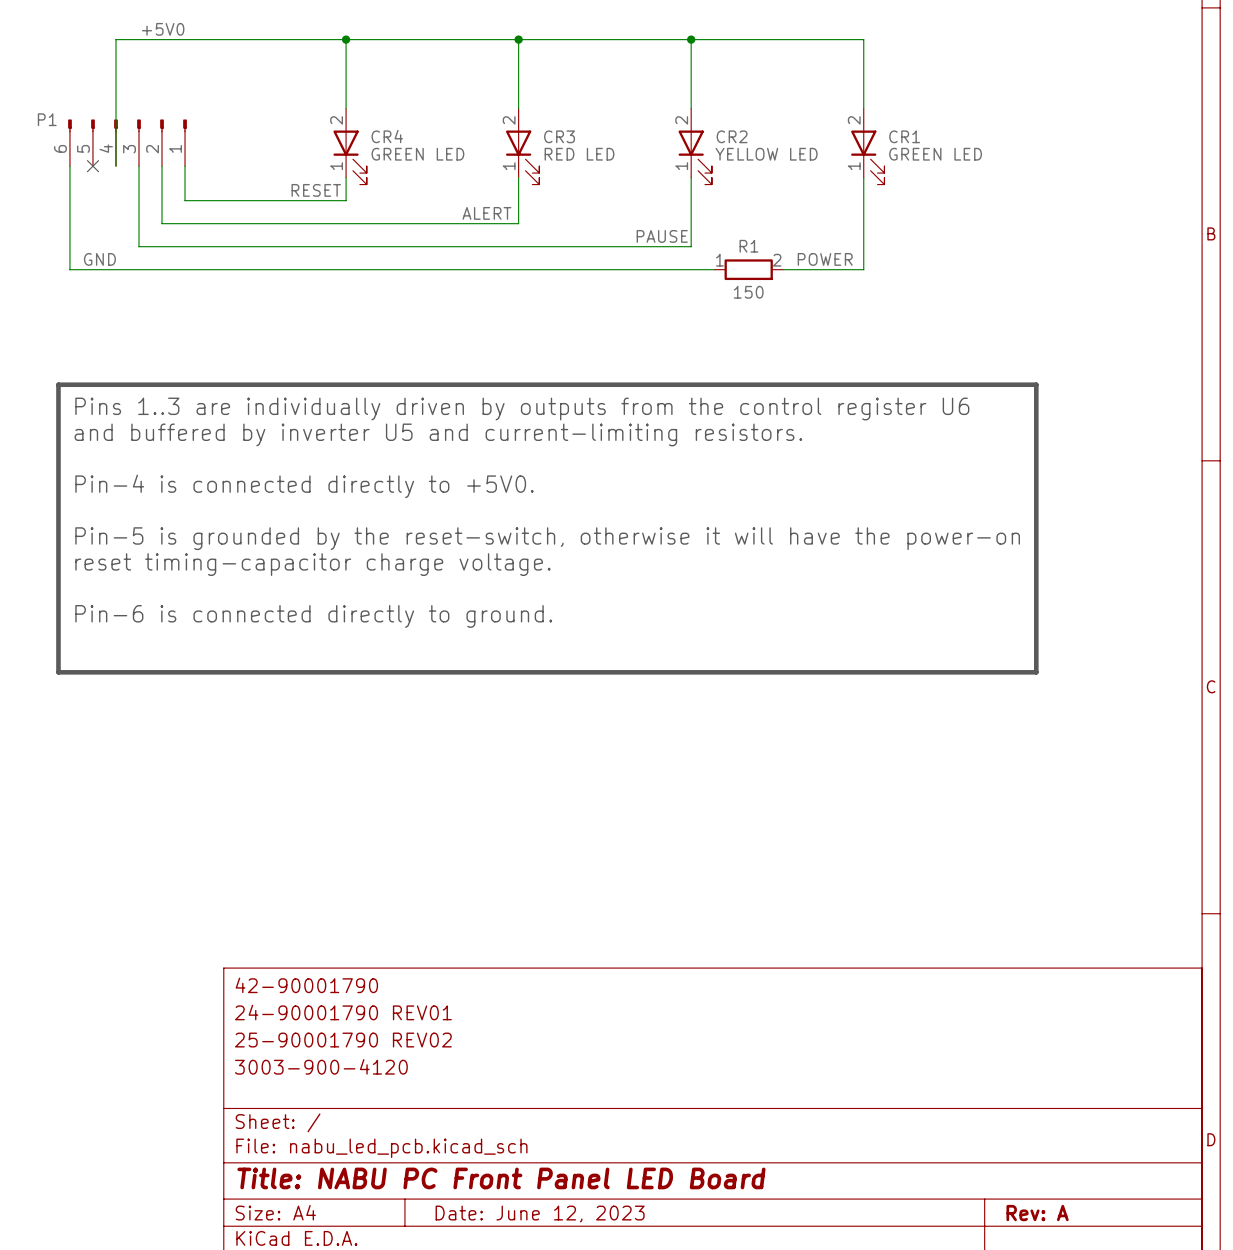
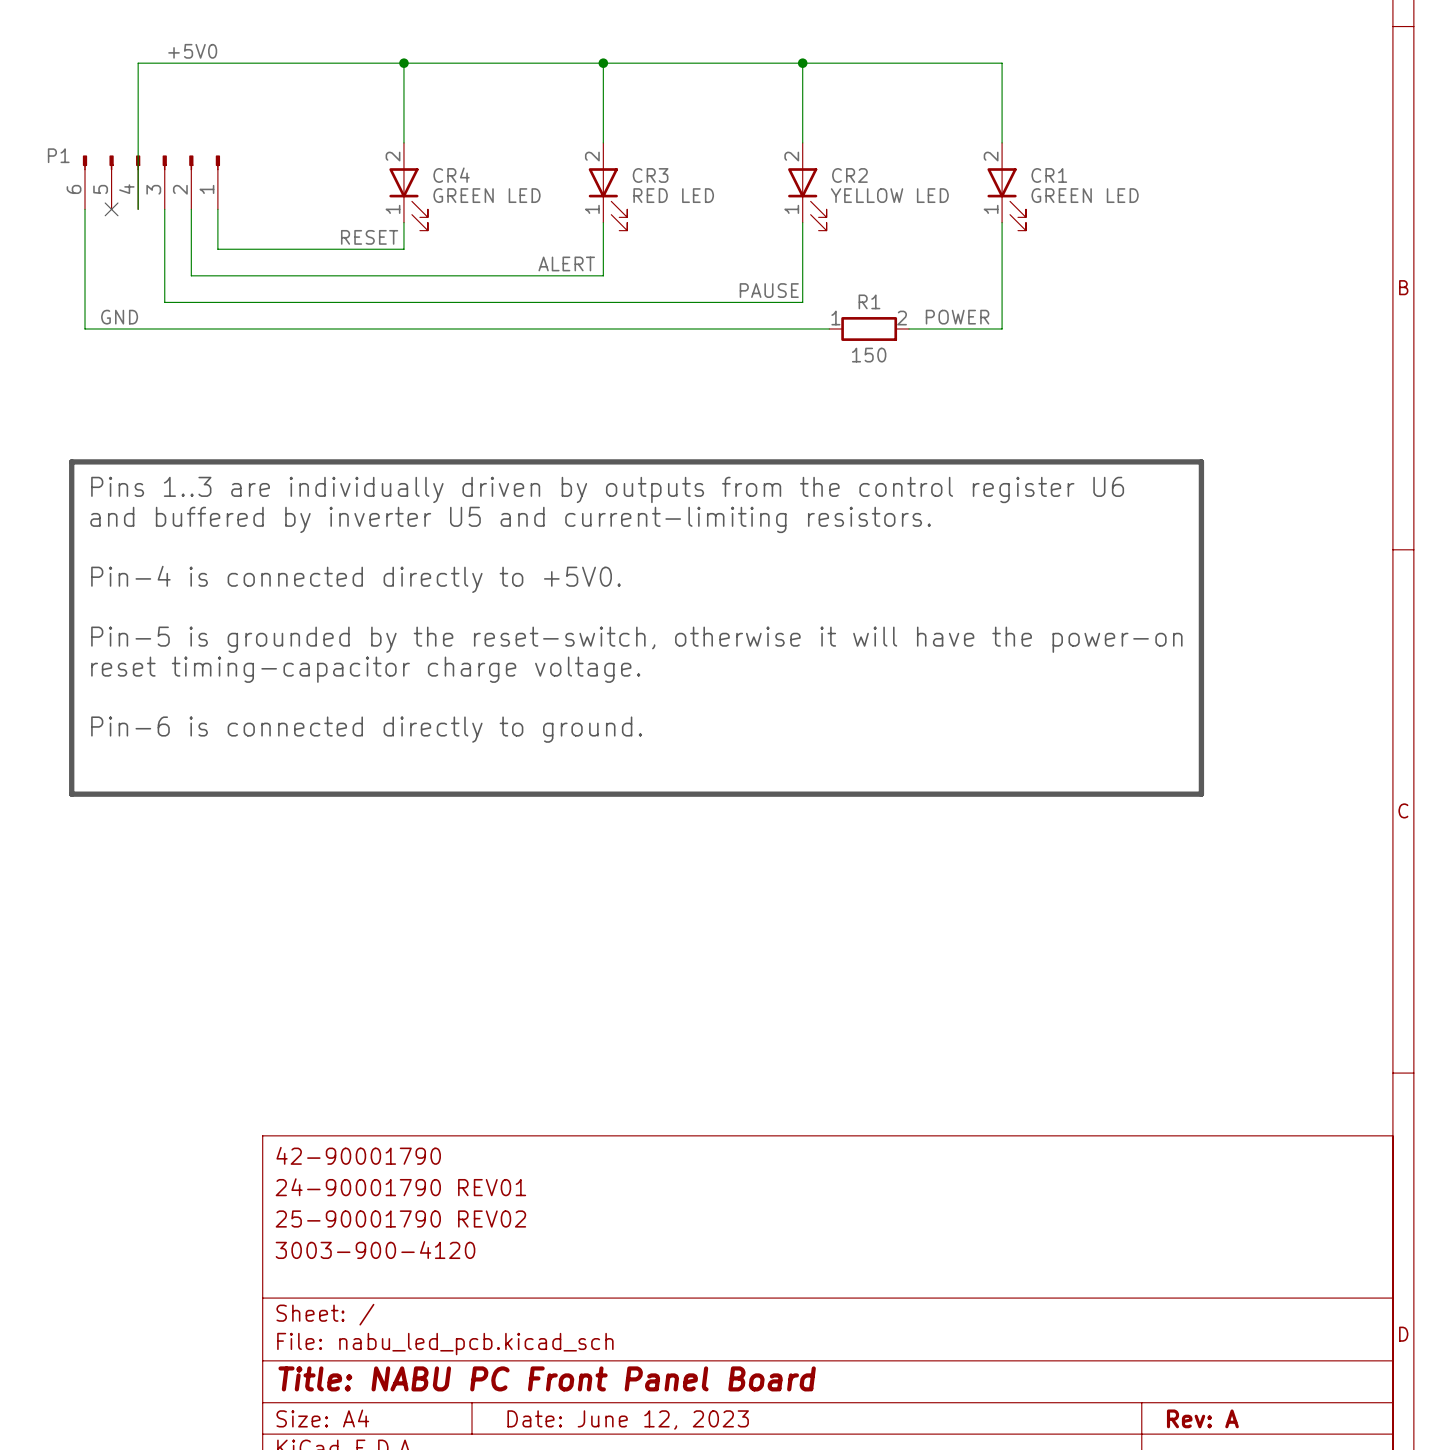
title block: Title: NABU PC Front Panel LED Board (501, 1178) -> Title: NABU PC Front Panel Board (547, 1378)

